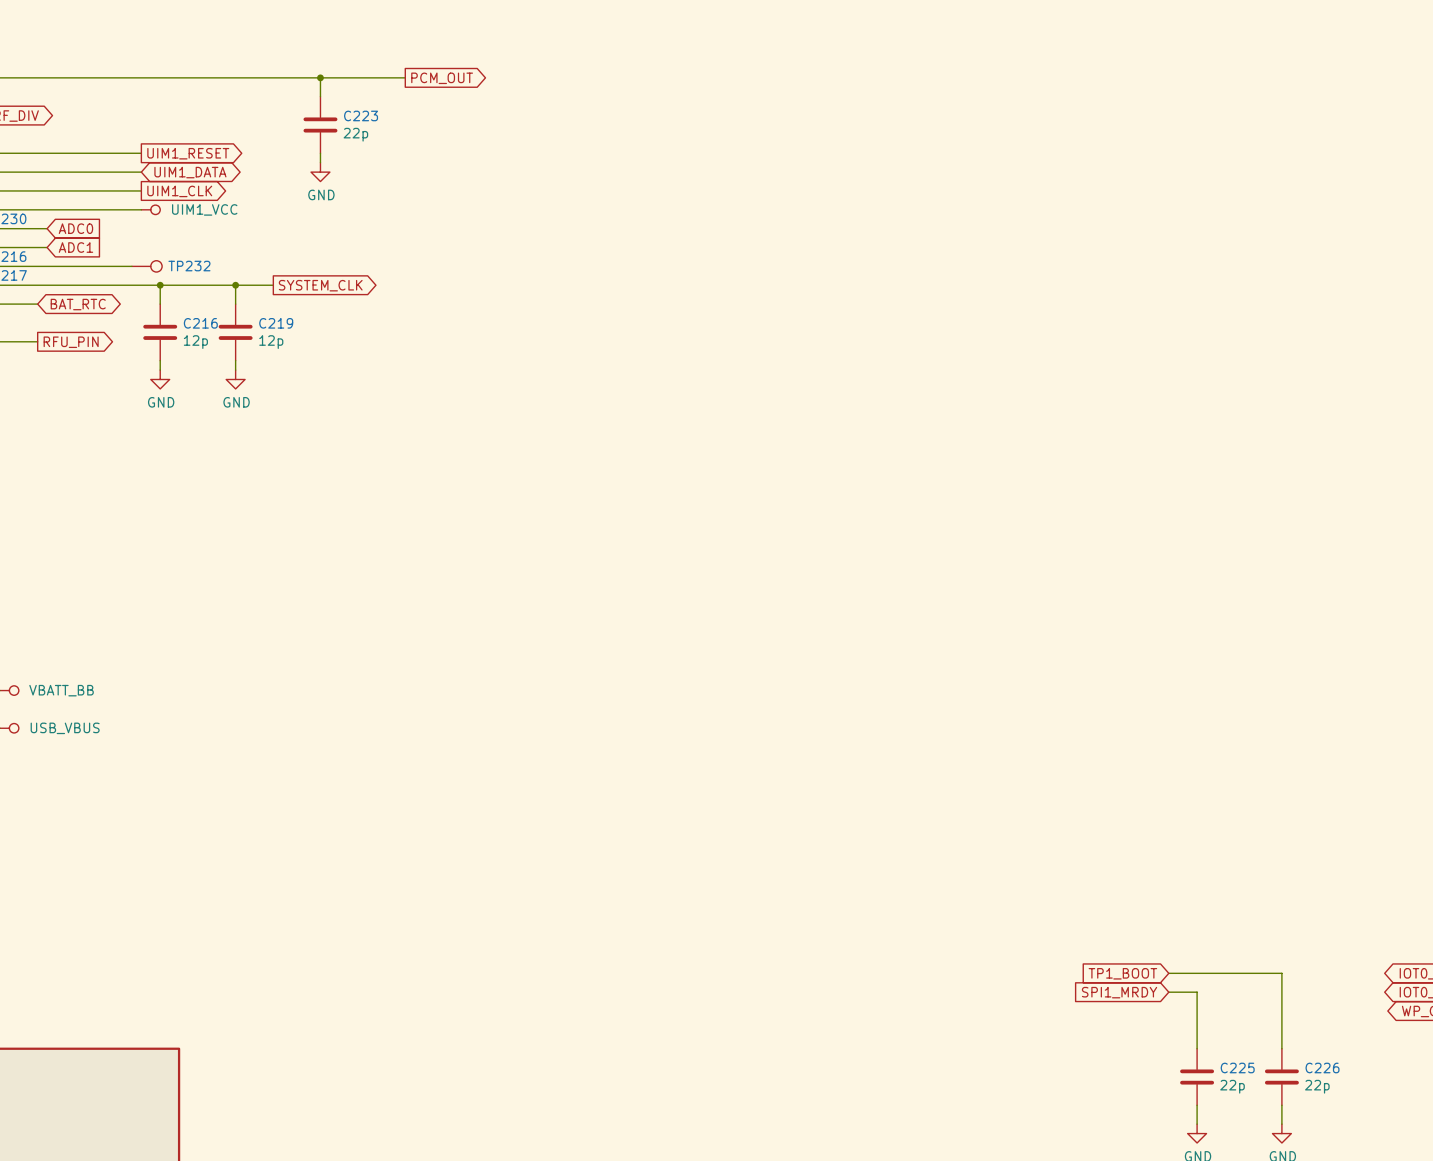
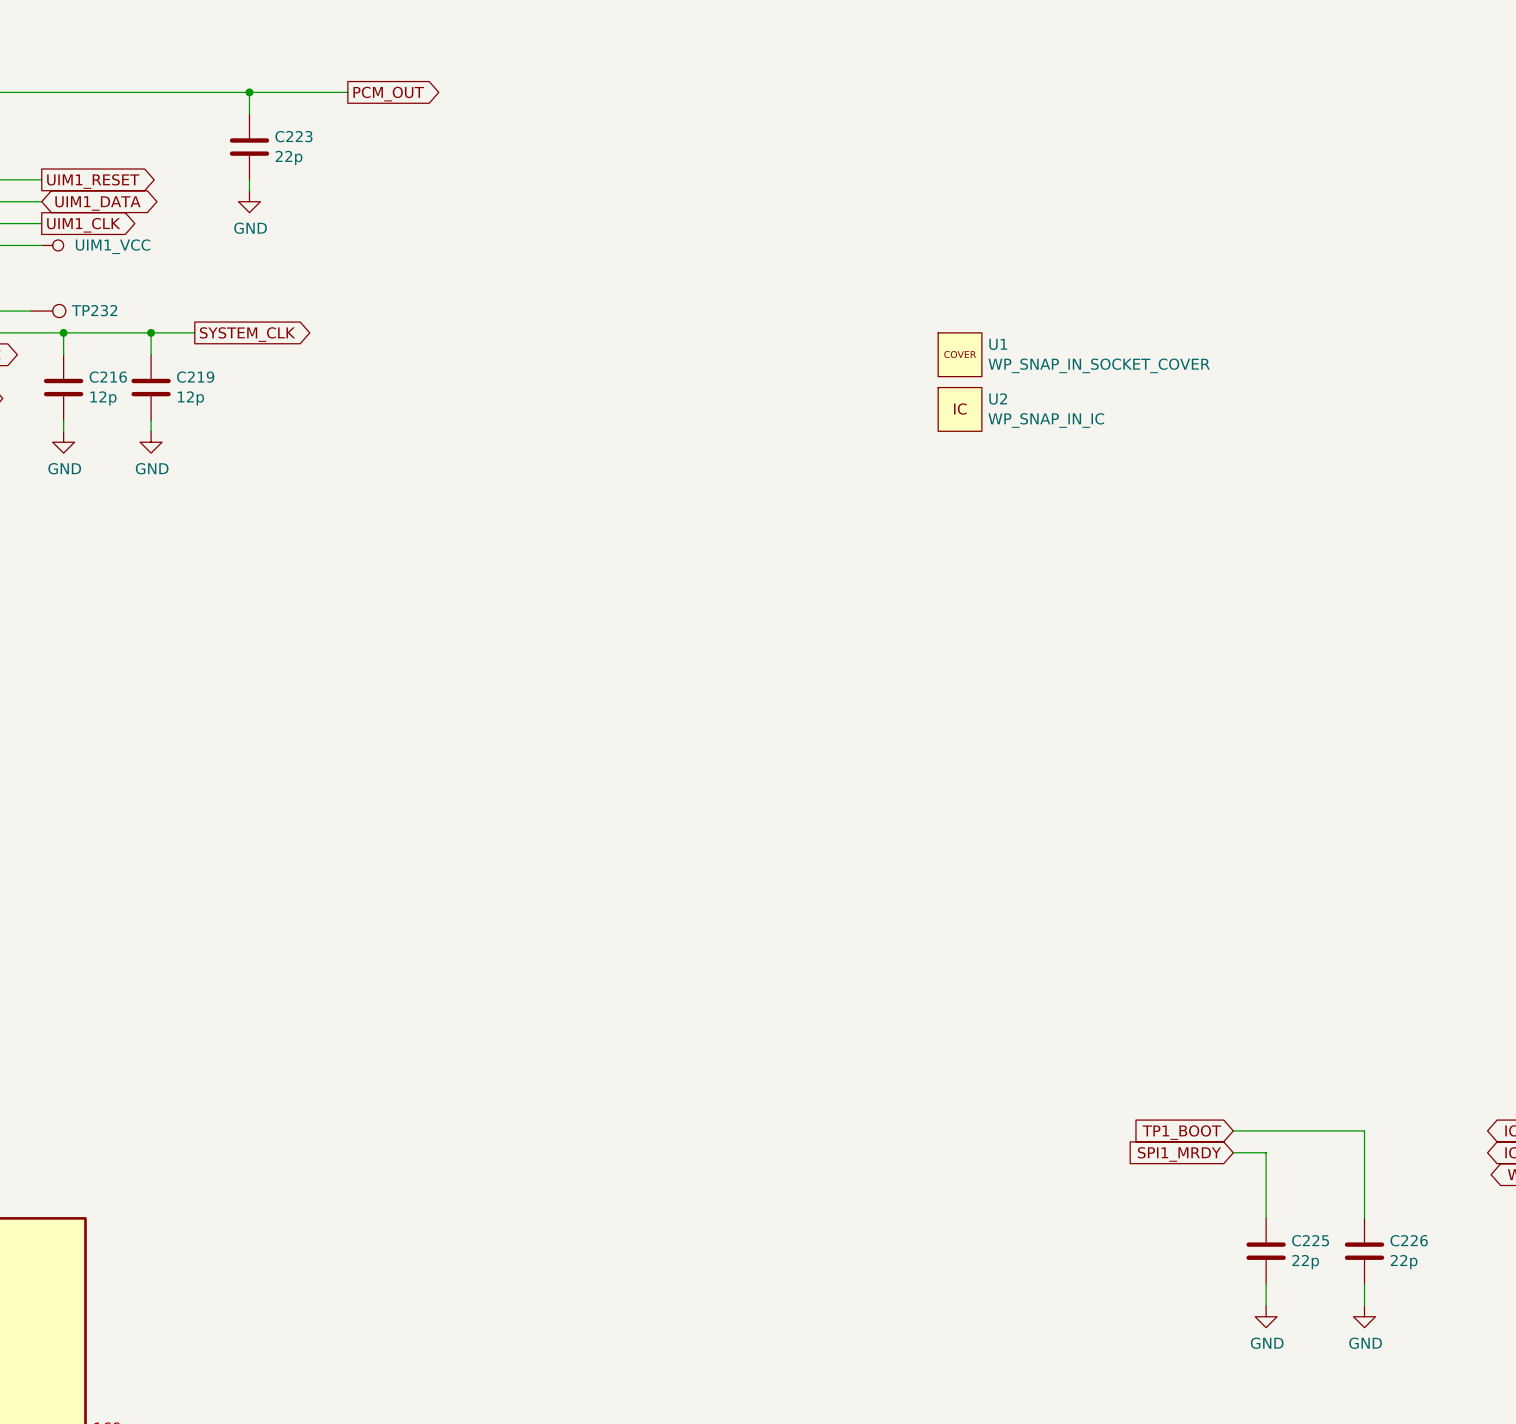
U1: none -> WP_SNAP_IN_SOCKET_COVER (960, 354)
U2: none -> WP_SNAP_IN_IC (960, 409)

